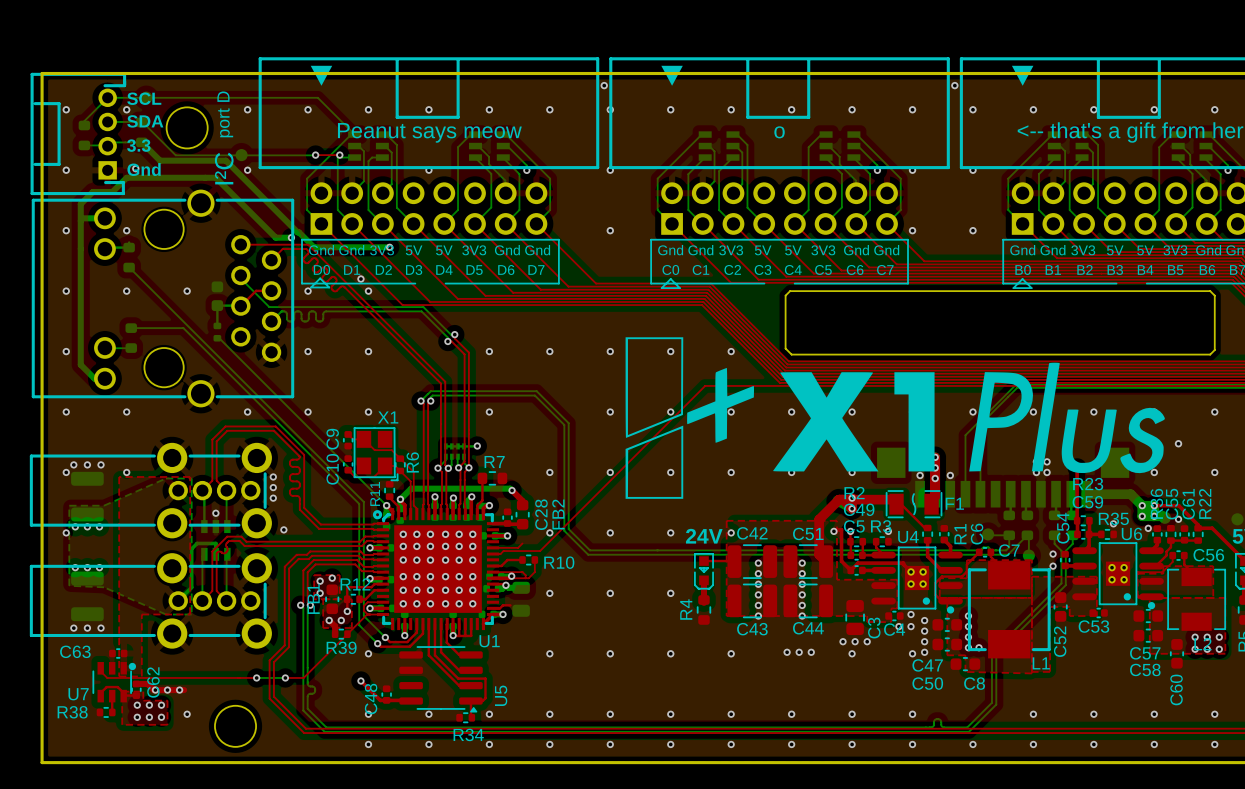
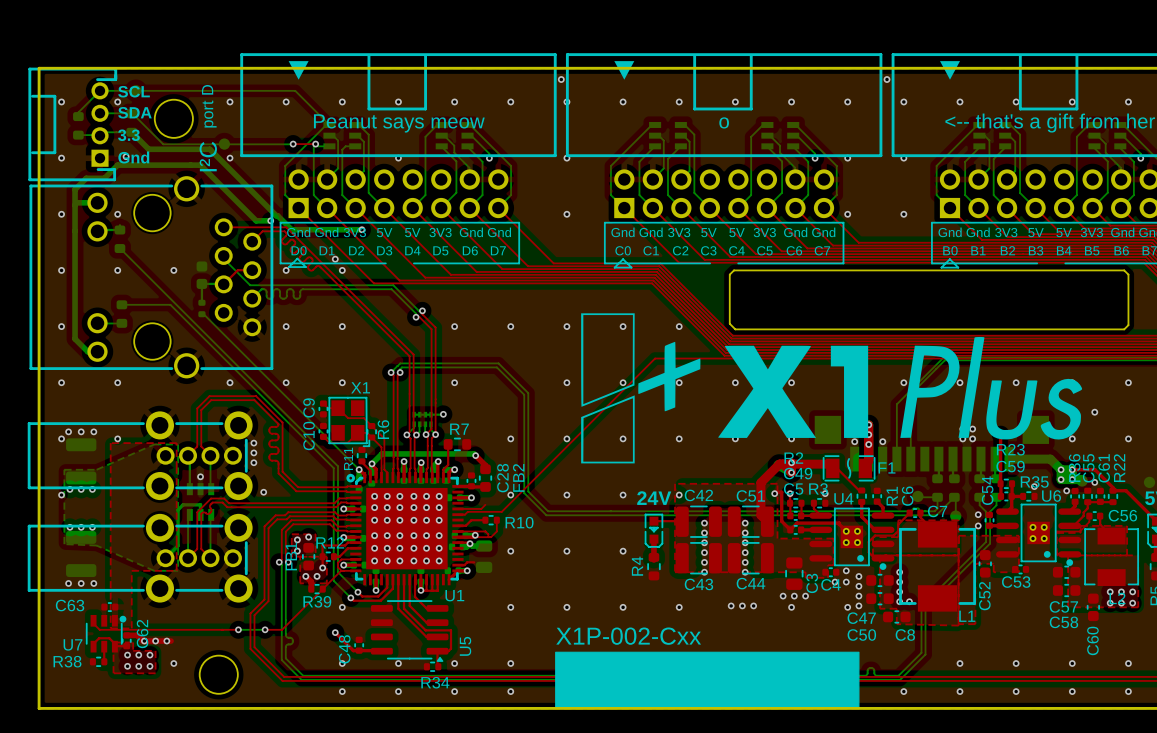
text: none -> X1P-002-Cxx (628, 636)
drawing: none -> [555, 651, 860, 709]

